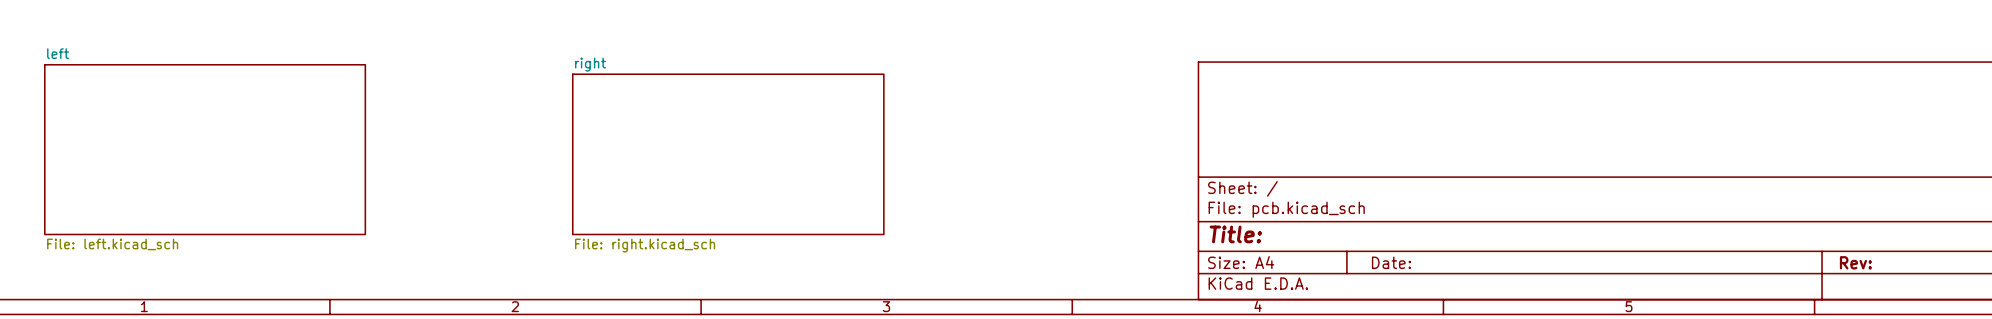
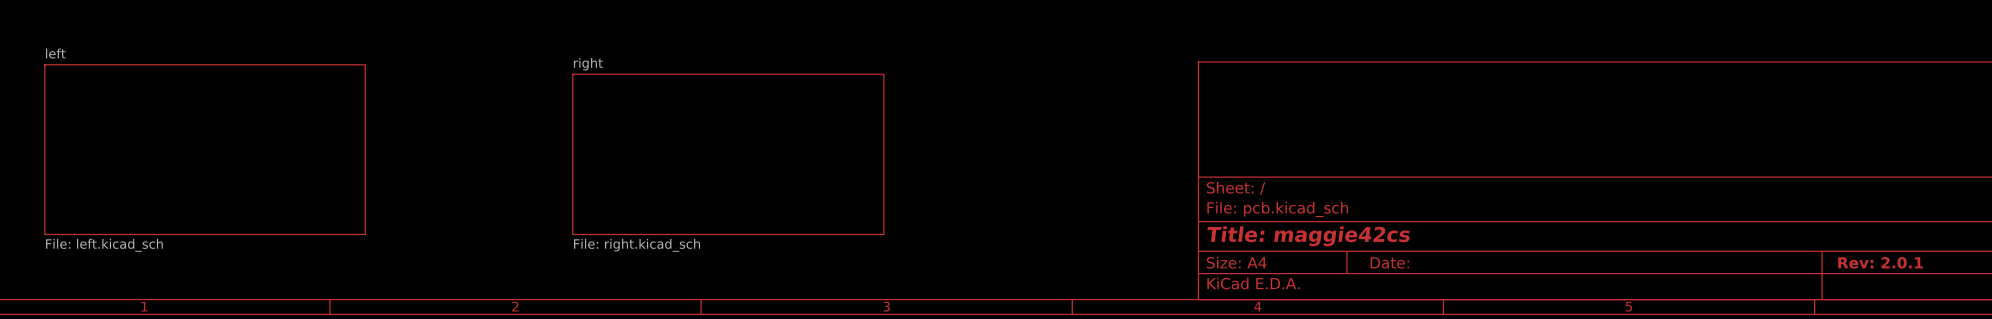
title block: Title: (1235, 234) -> Title: maggie42cs (1308, 236)
title block: Rev: (1855, 262) -> Rev: 2.0.1 (1880, 262)

